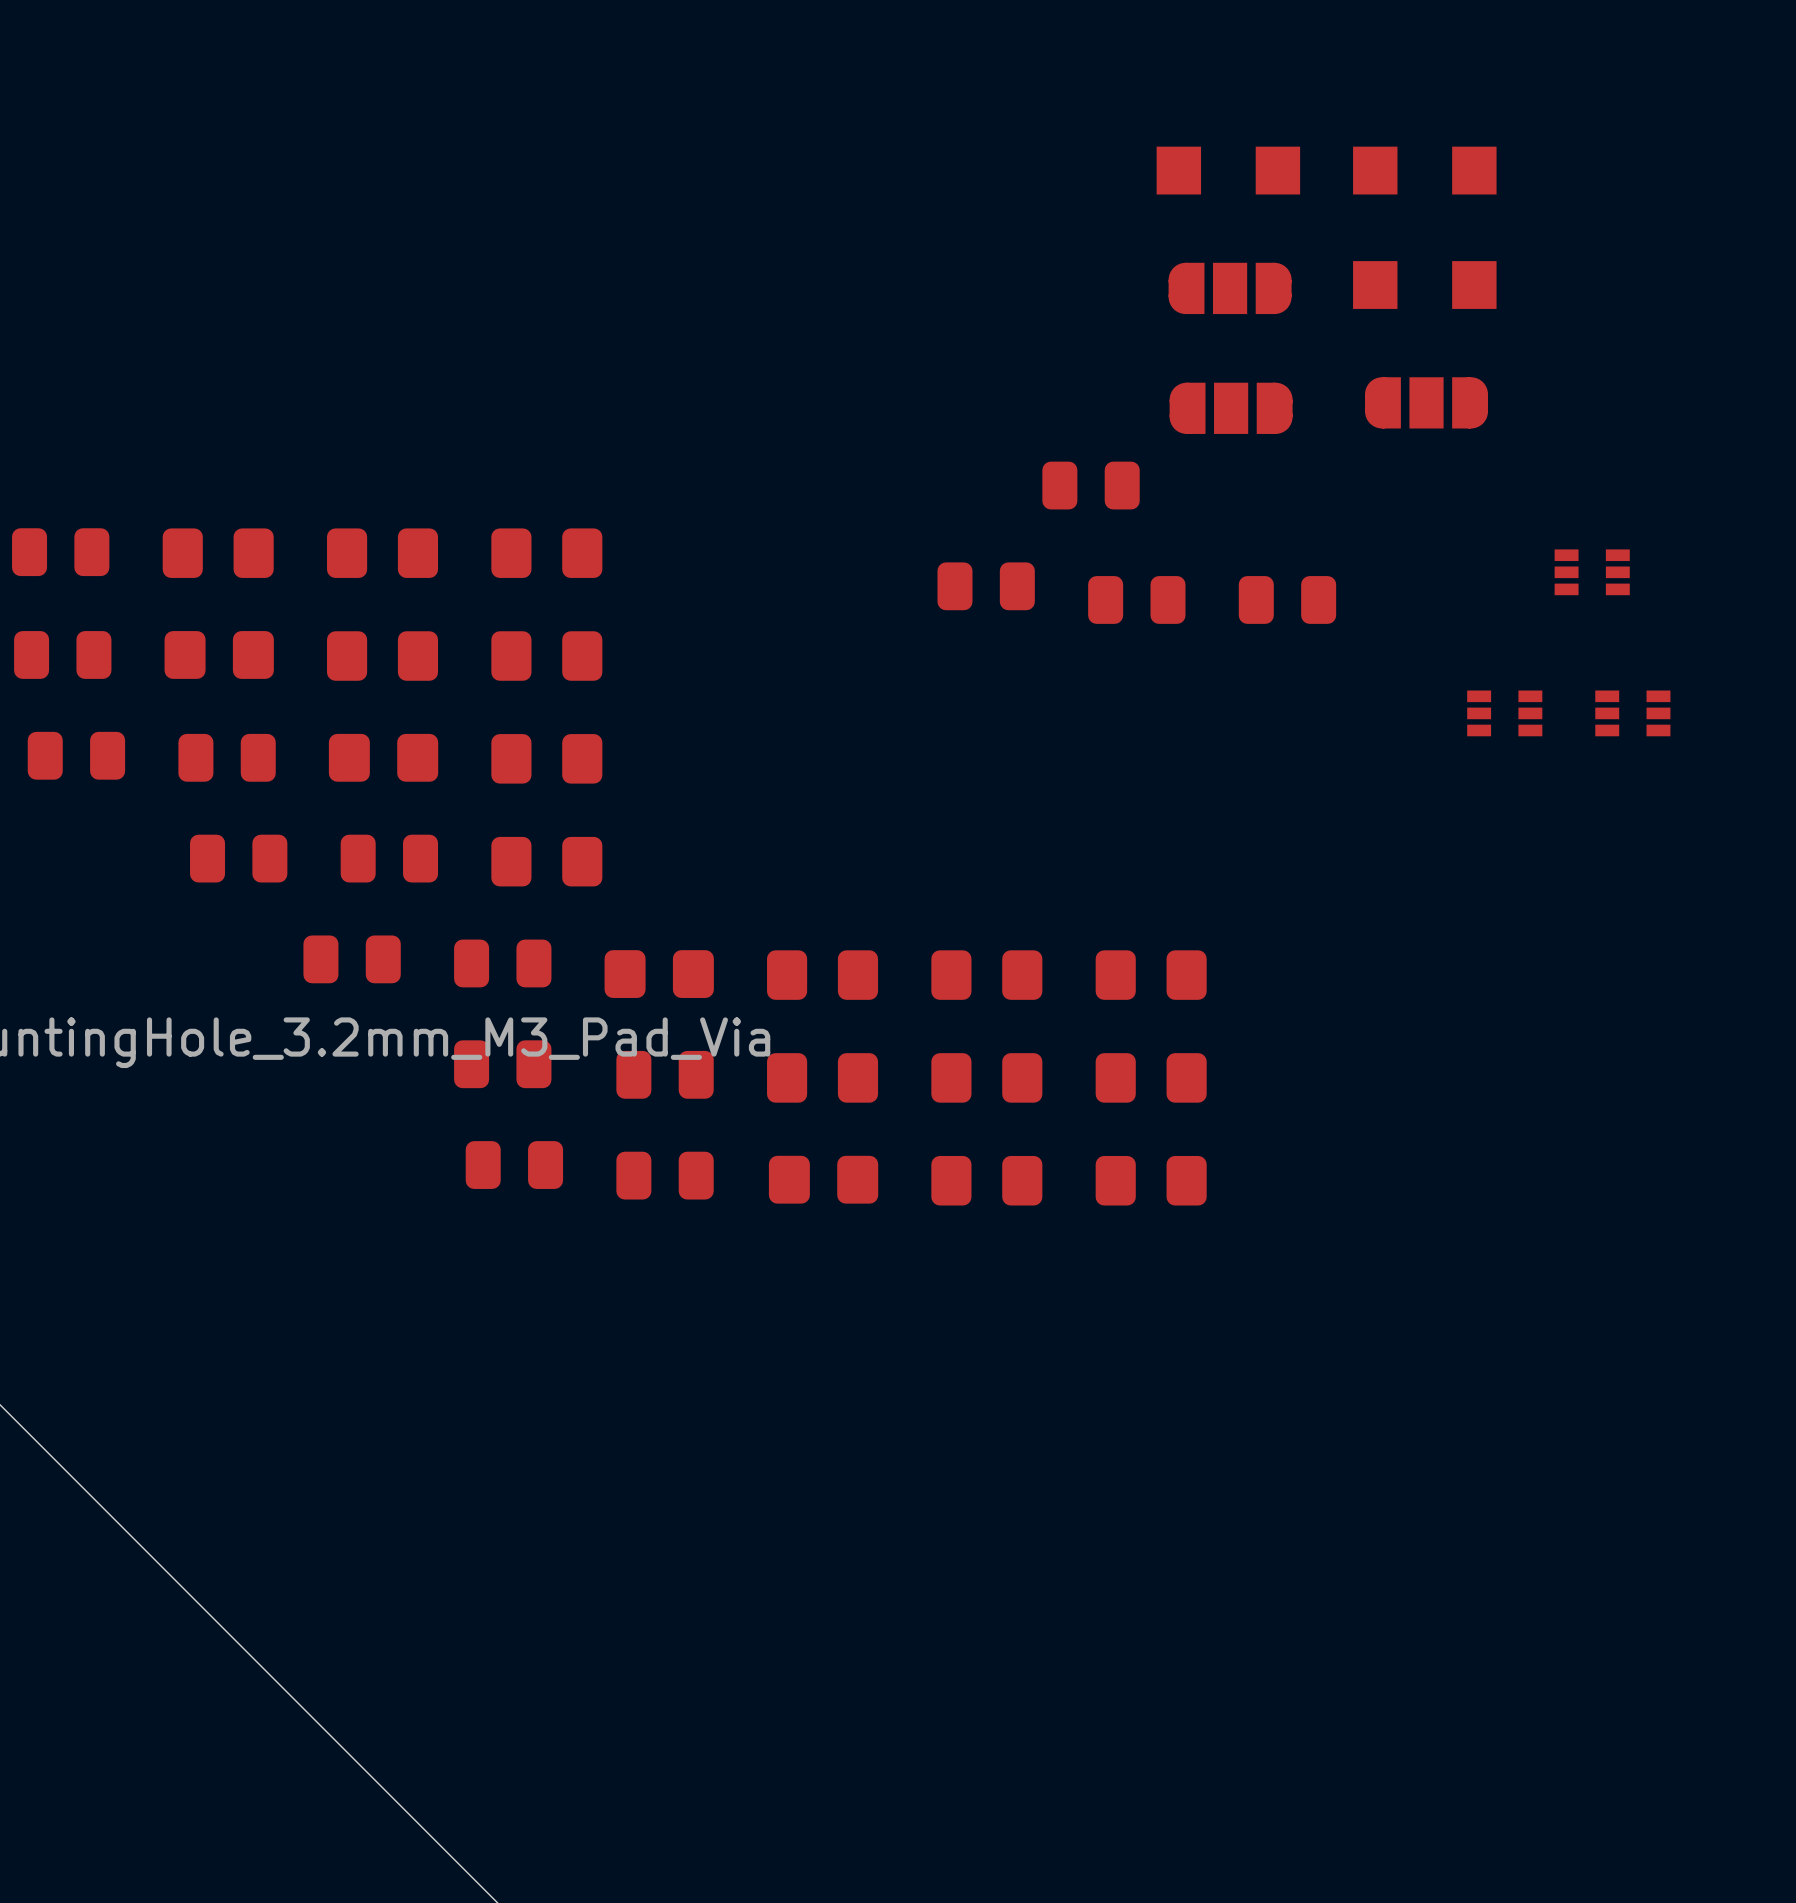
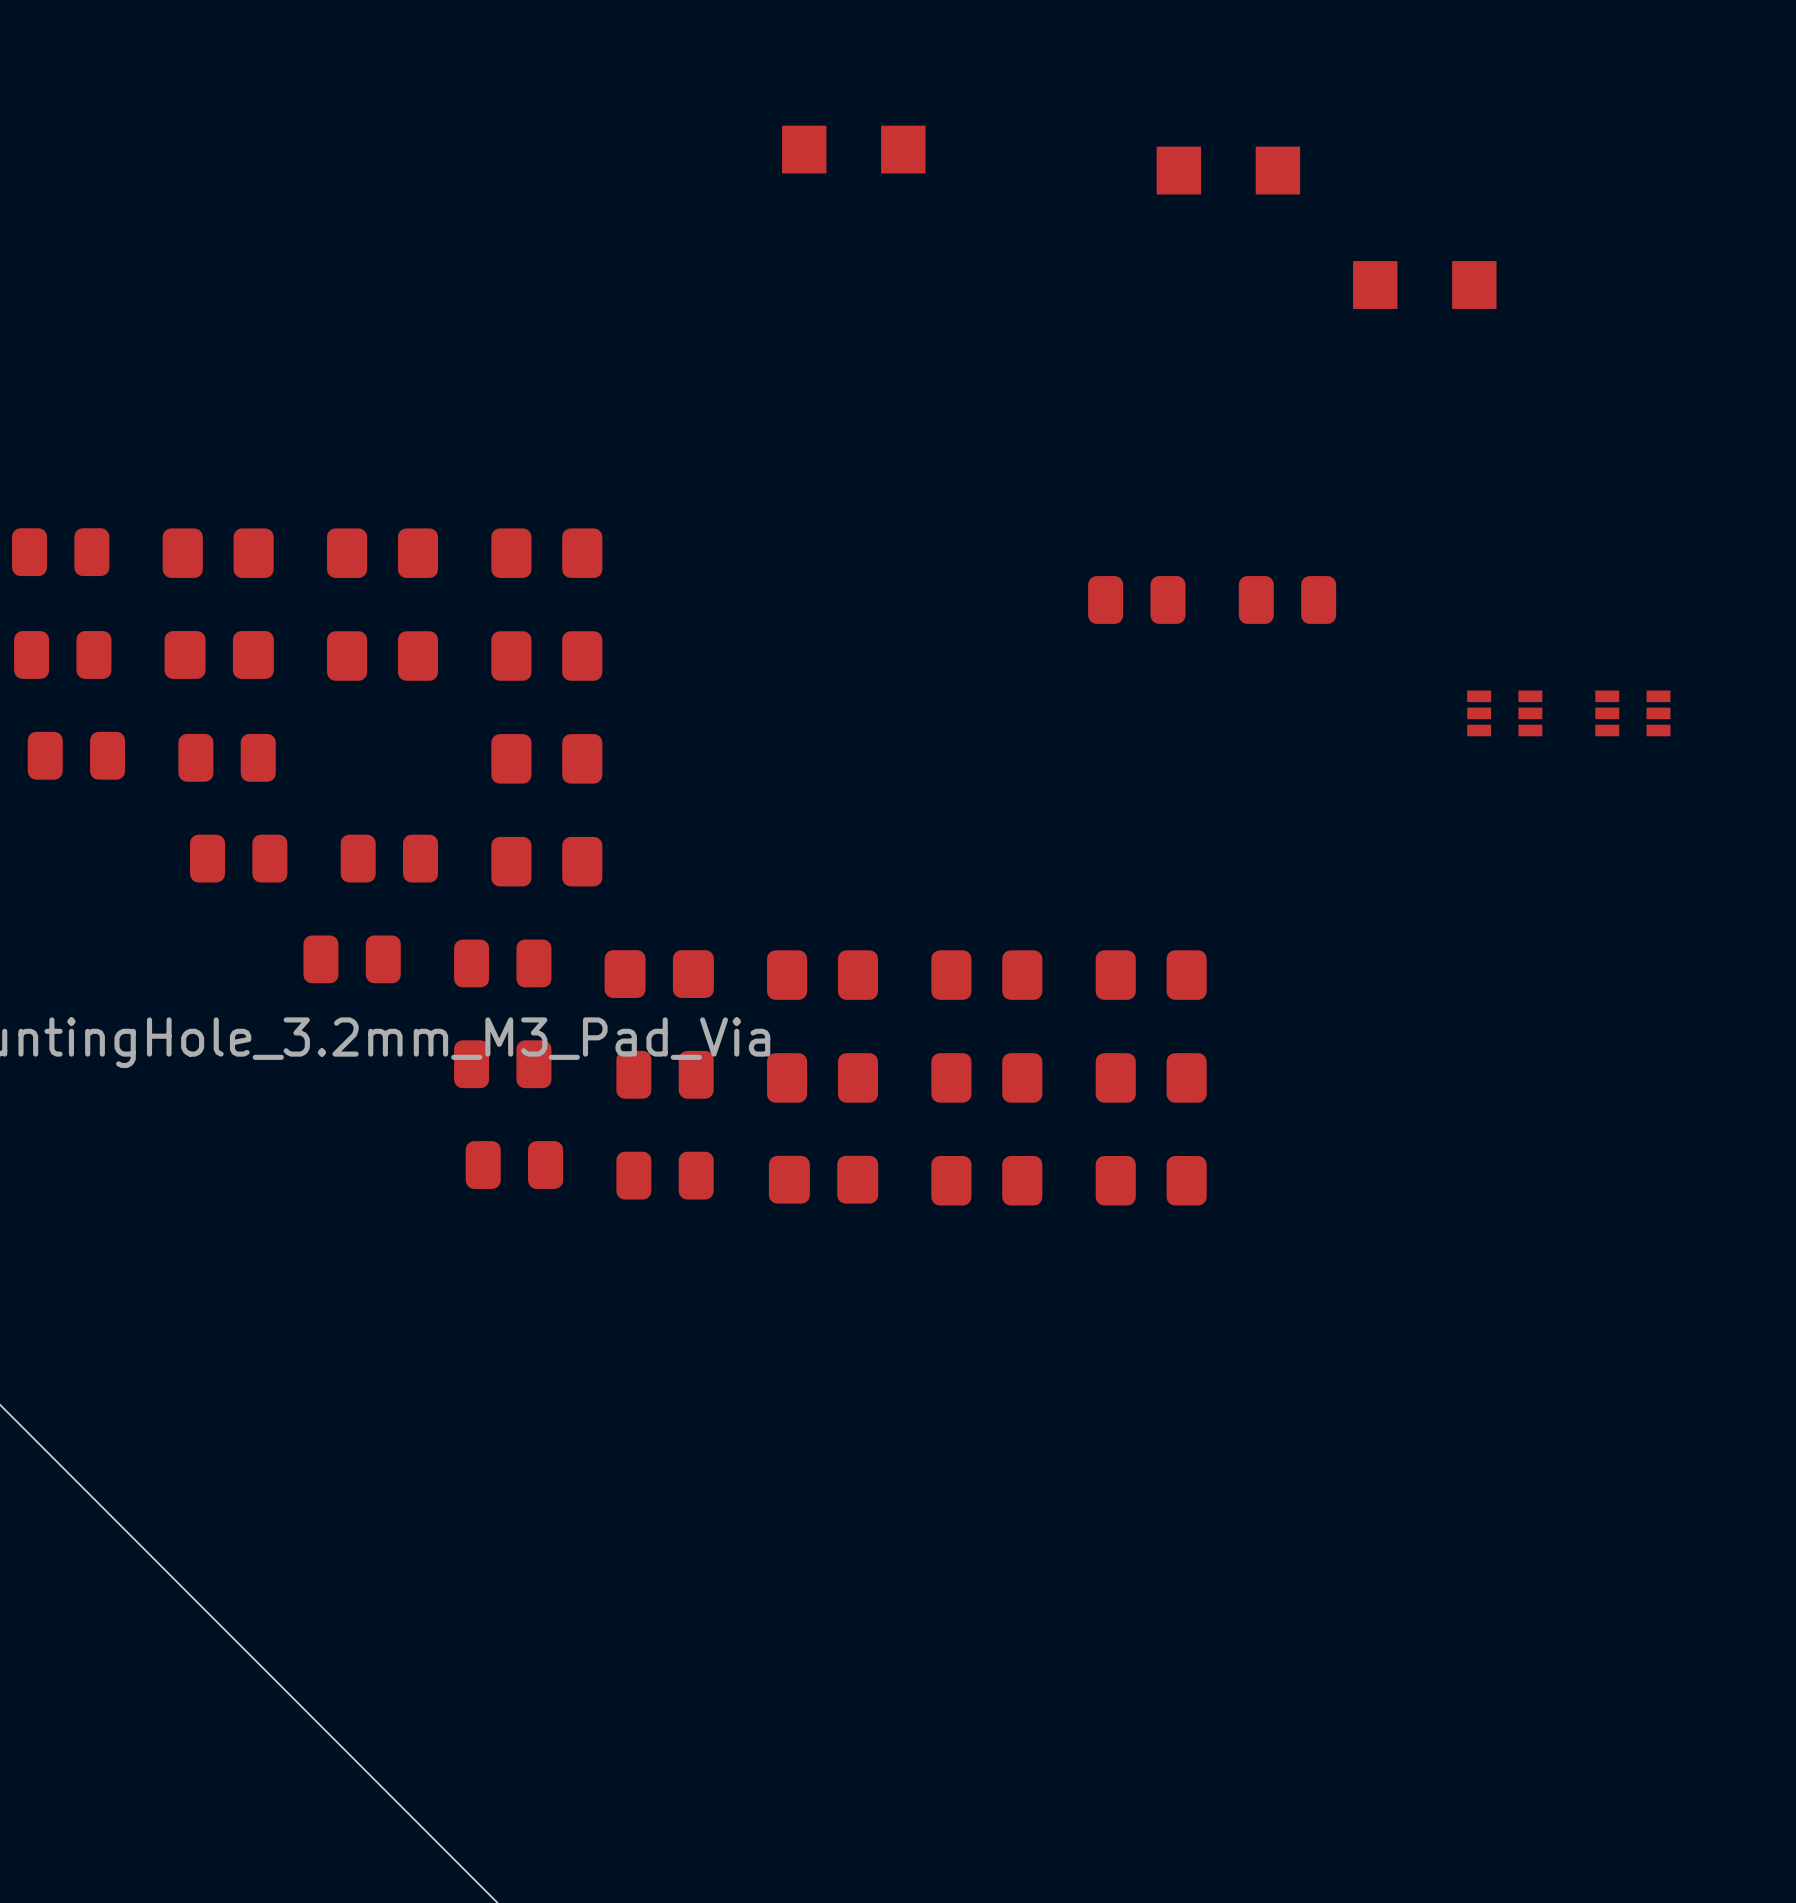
part position: (1424, 170) -> (853, 149)
part: (1230, 288) -> none
part: (1426, 402) -> none
part: (1231, 408) -> none
part: (1091, 485) -> none
part: (1592, 572) -> none
part: (986, 586) -> none
part: (383, 757) -> none

